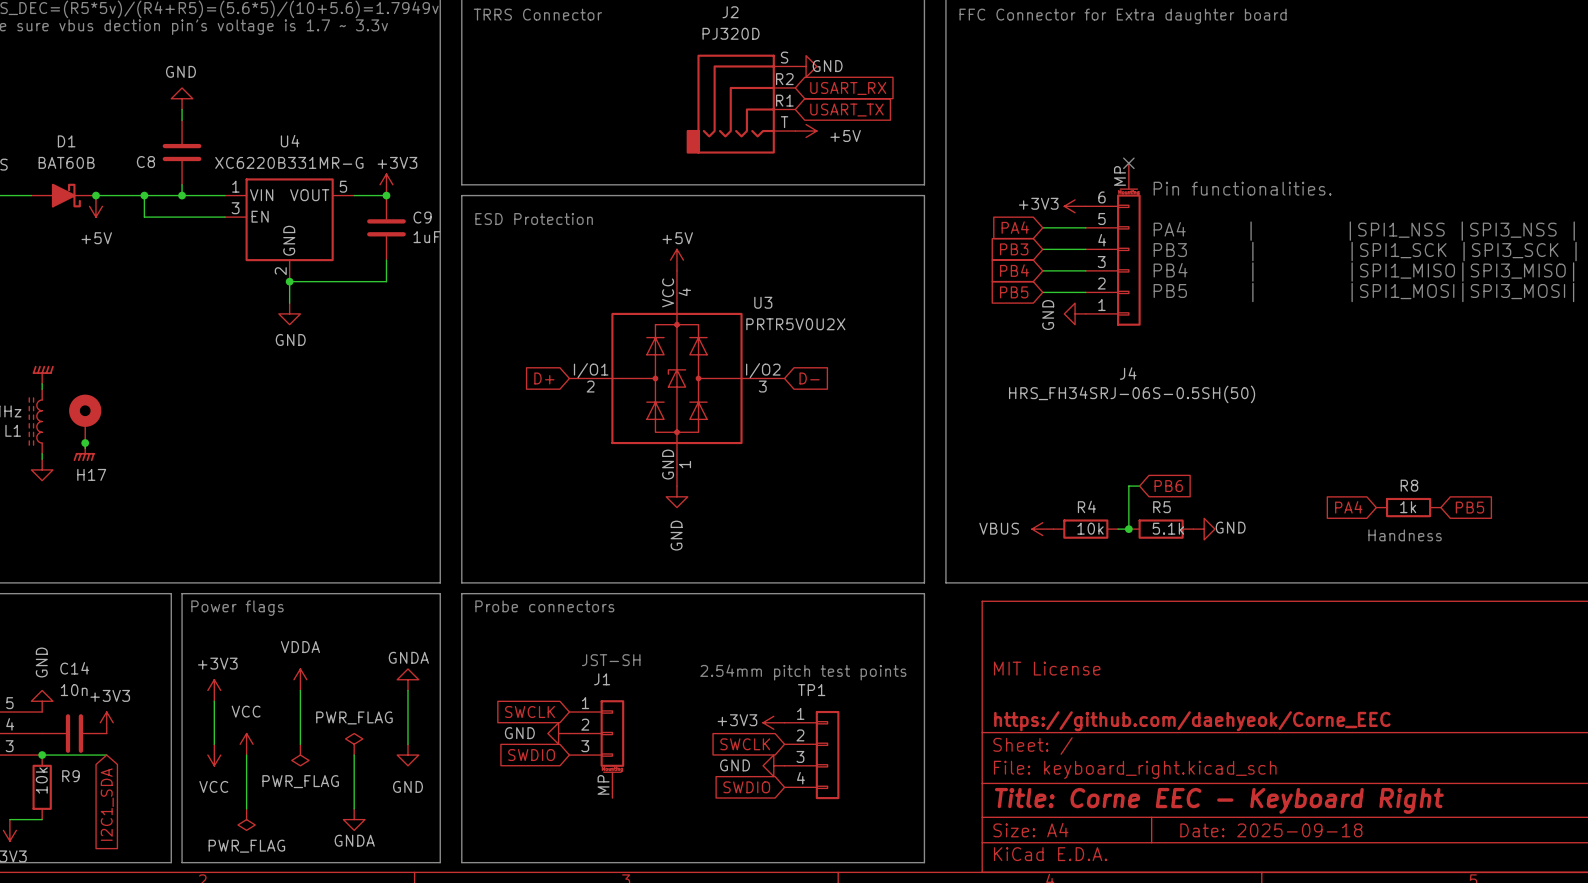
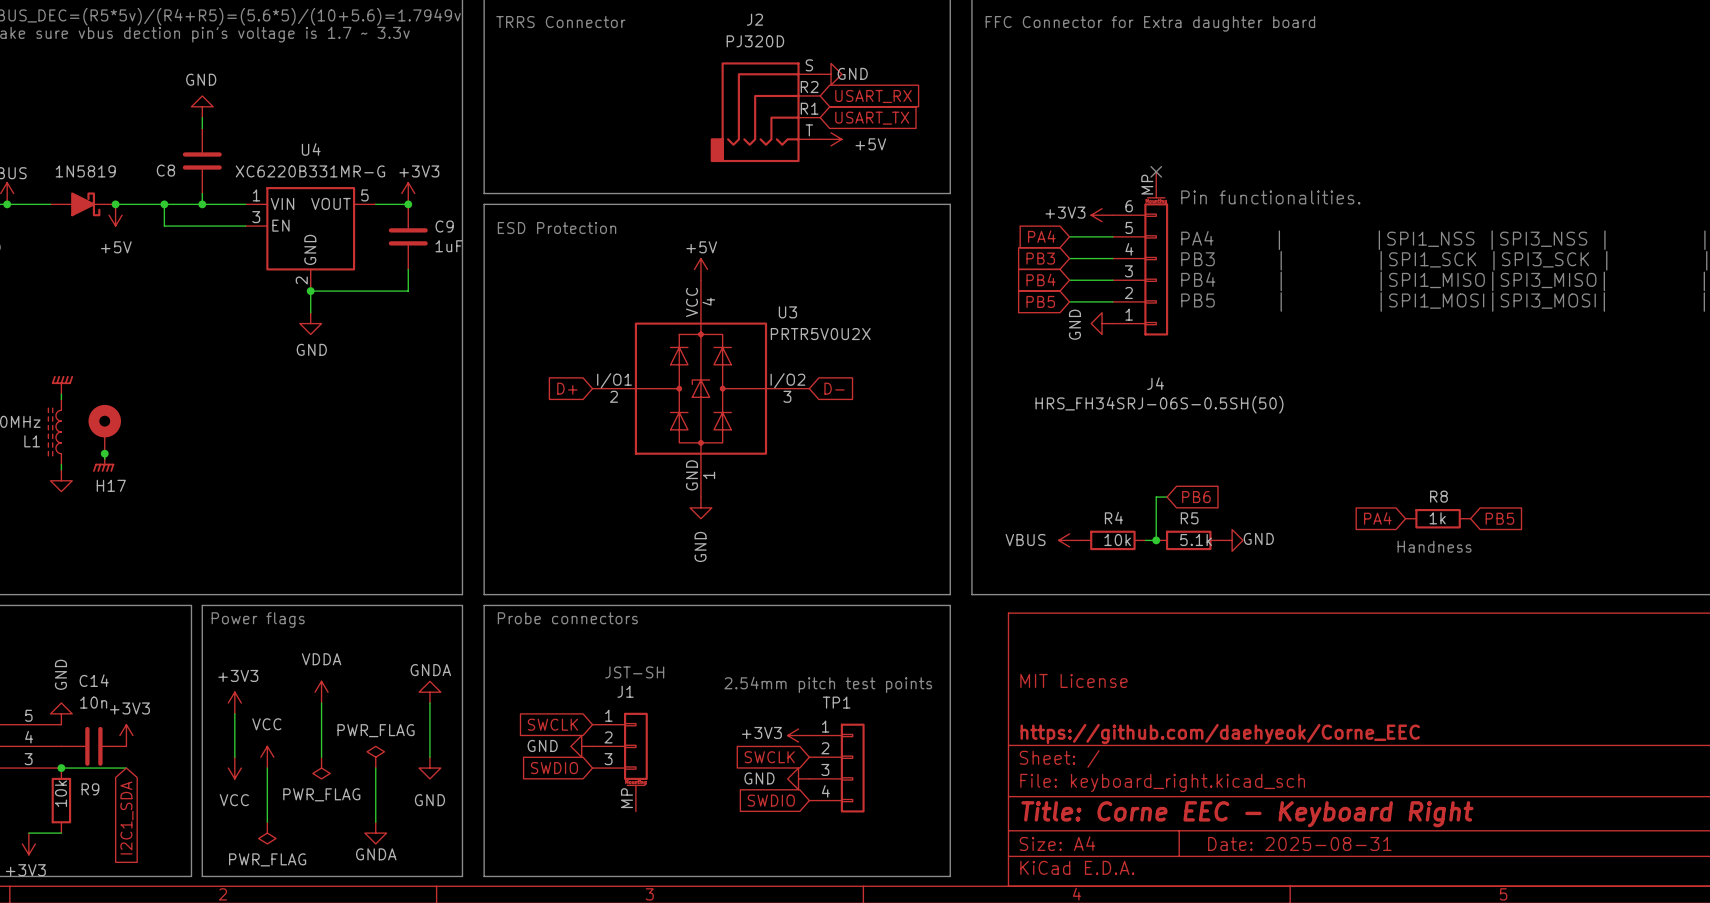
D1 name: D1 (66, 141) -> none
D1 value: BAT60B (66, 162) -> 1N5819 (85, 171)
title block: Date: 2025-09-18 (1271, 830) -> Date: 2025-08-31 (1299, 843)

